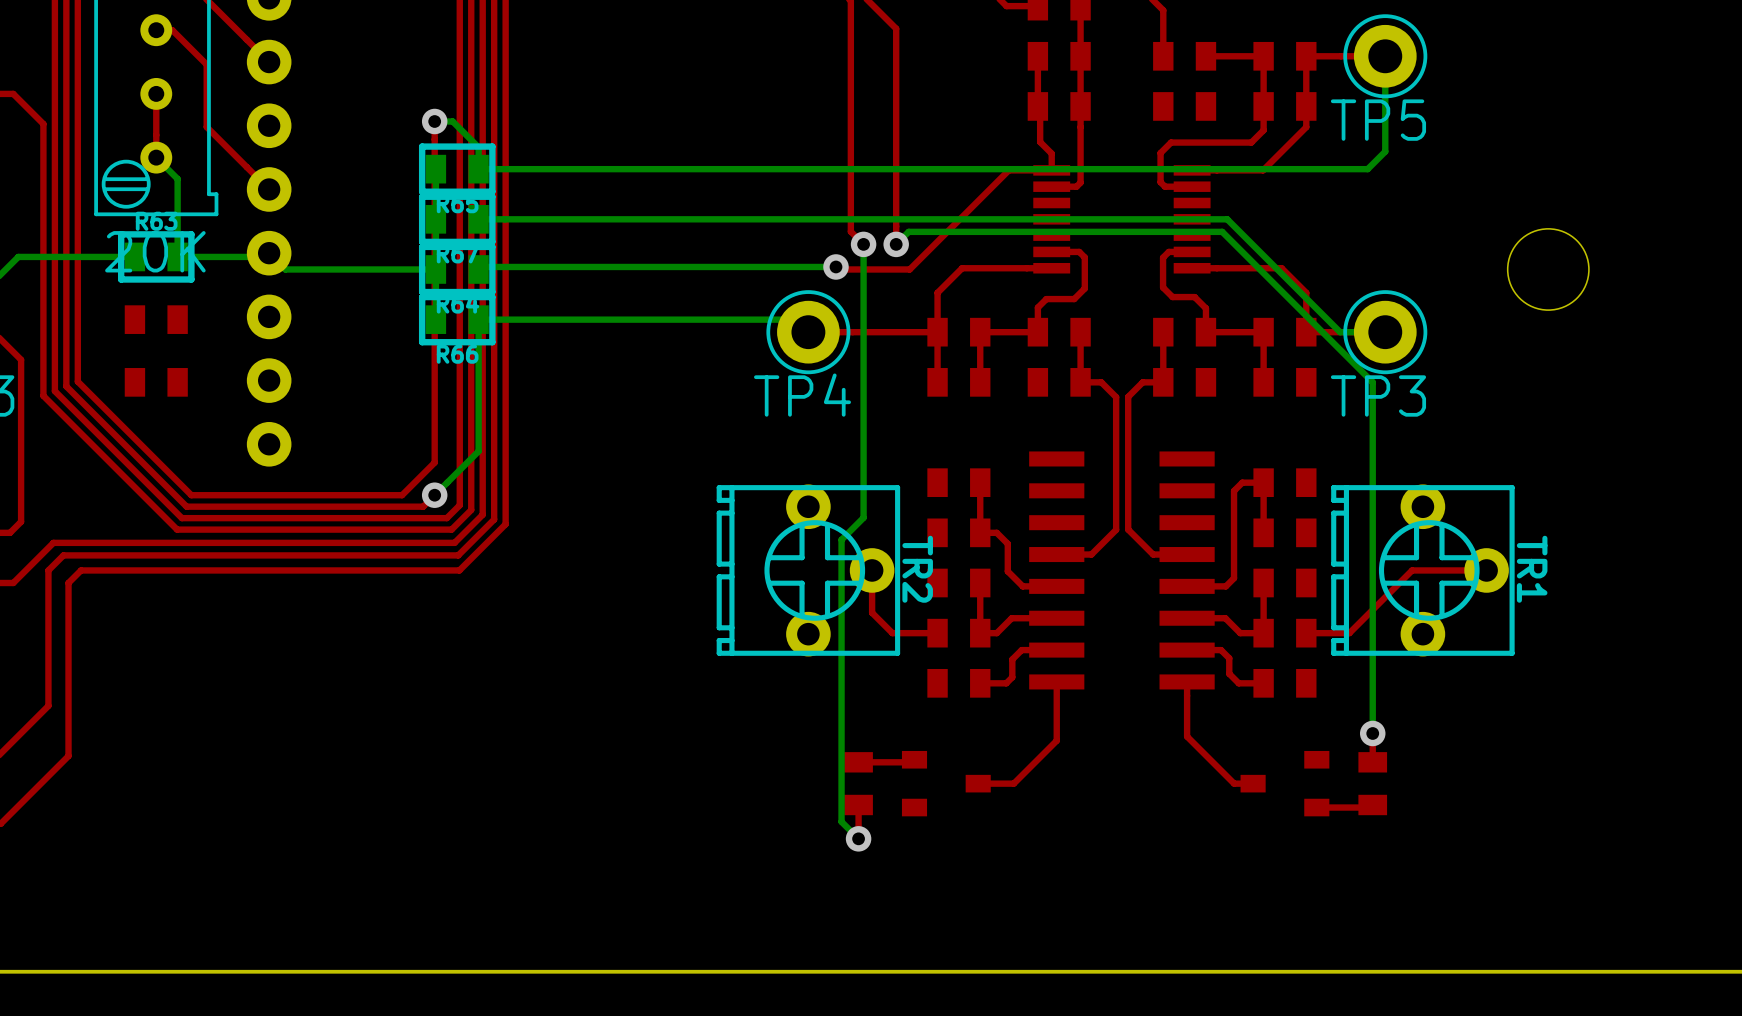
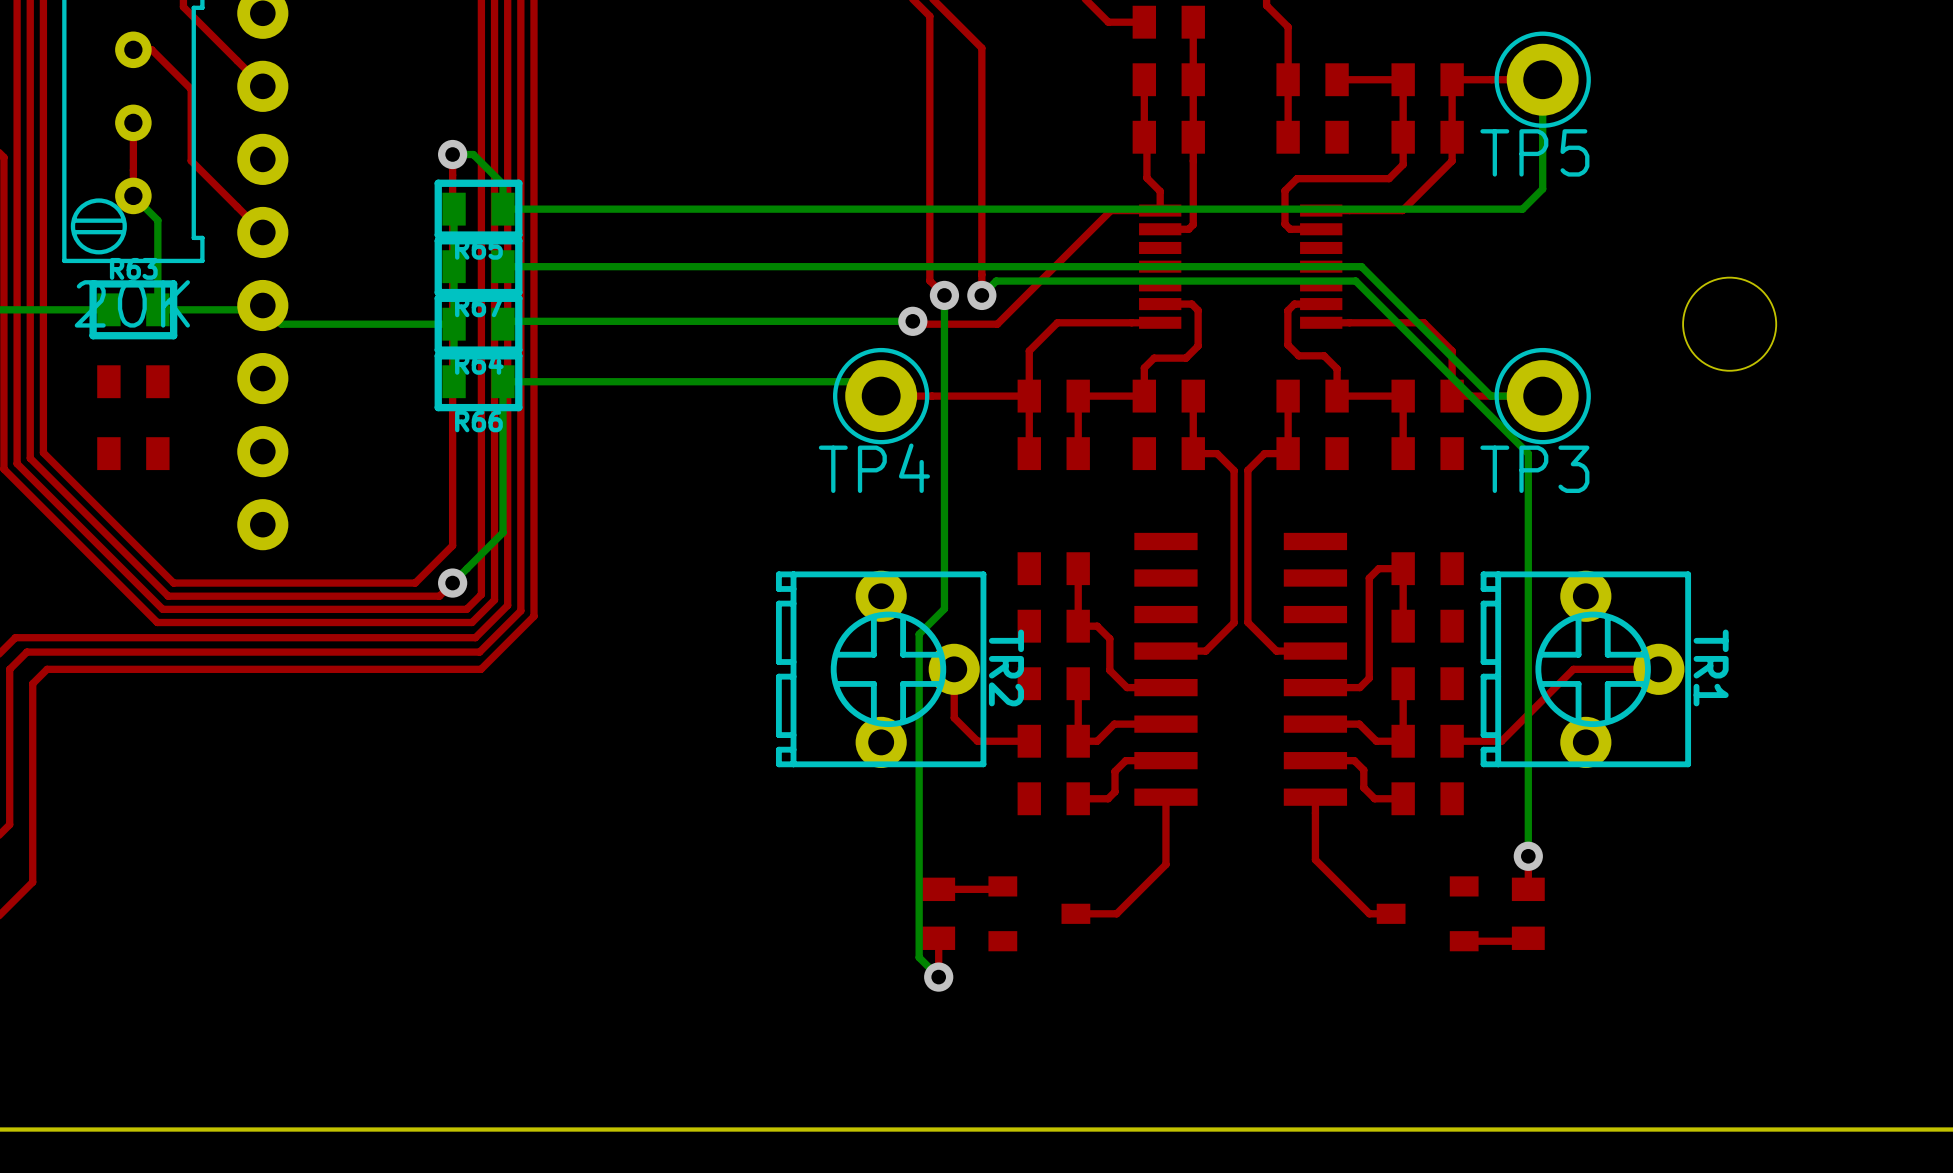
top track: none -> (1288, 79) (1288, 137)

